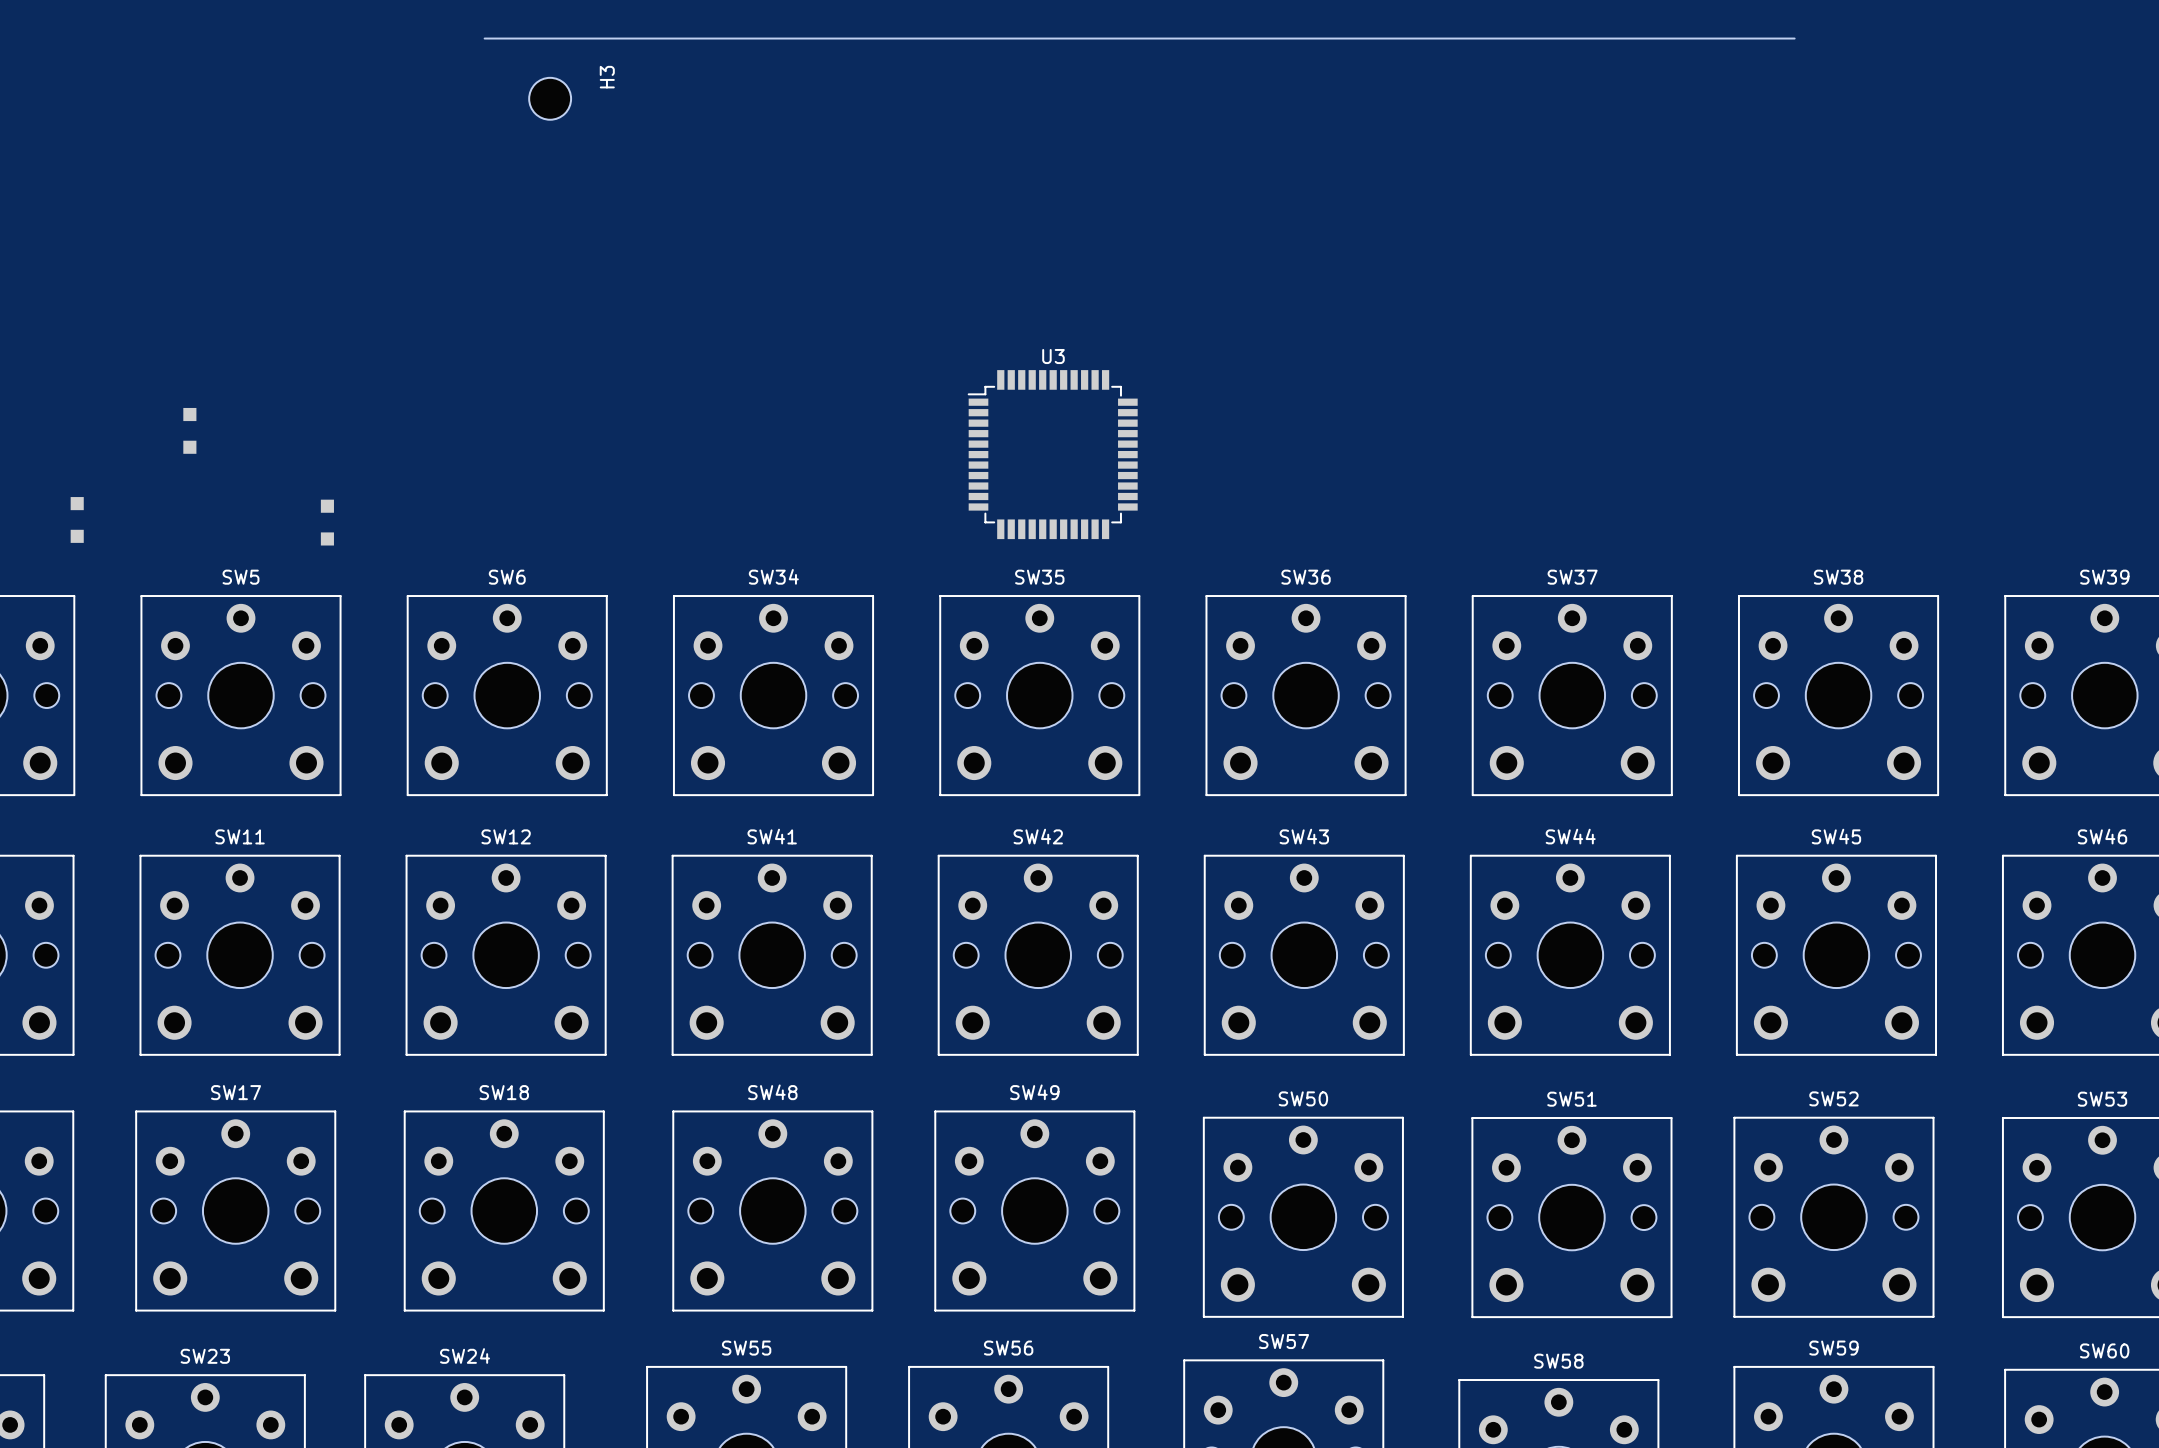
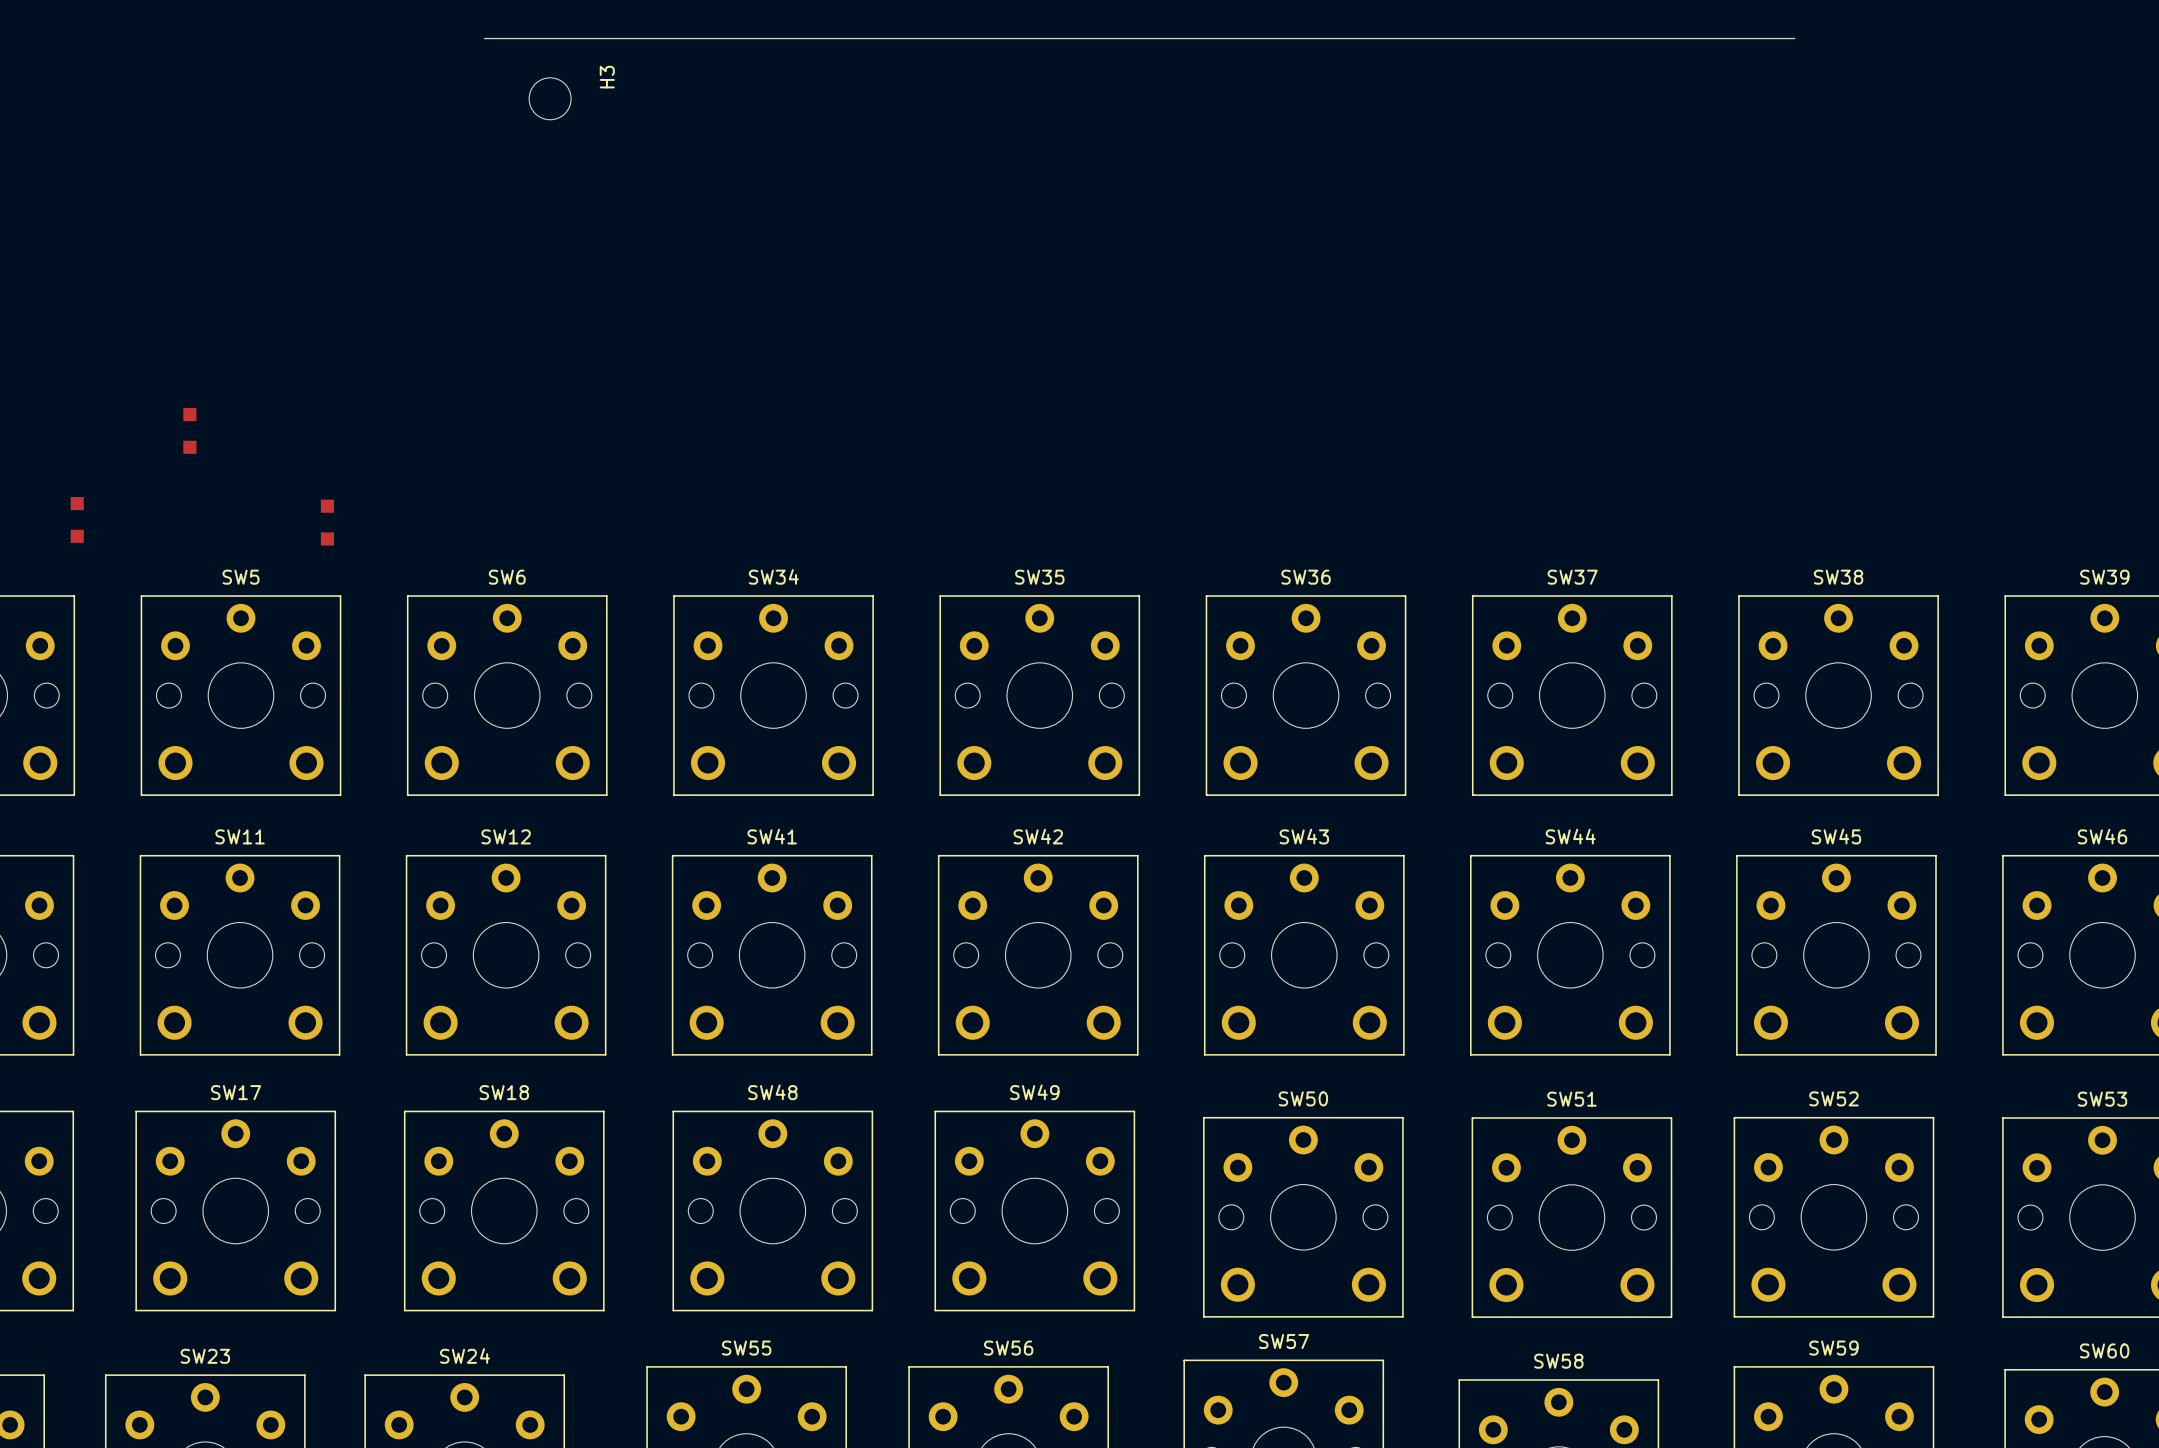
U3: (1052, 454) -> none

